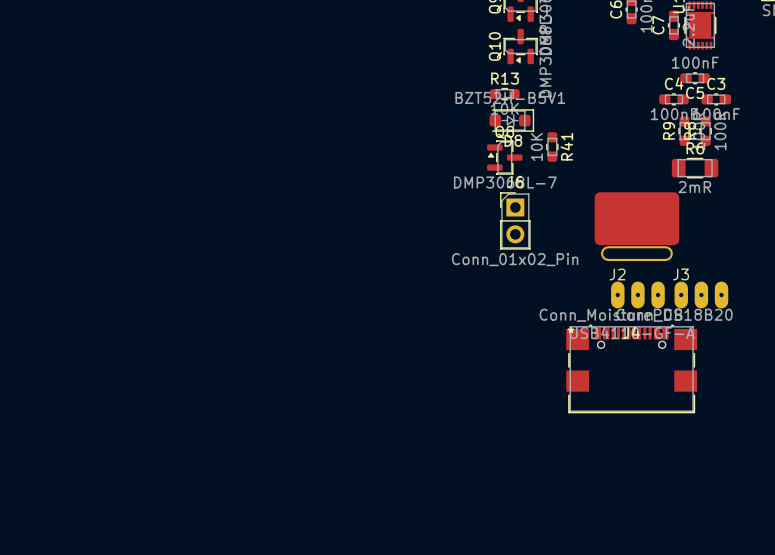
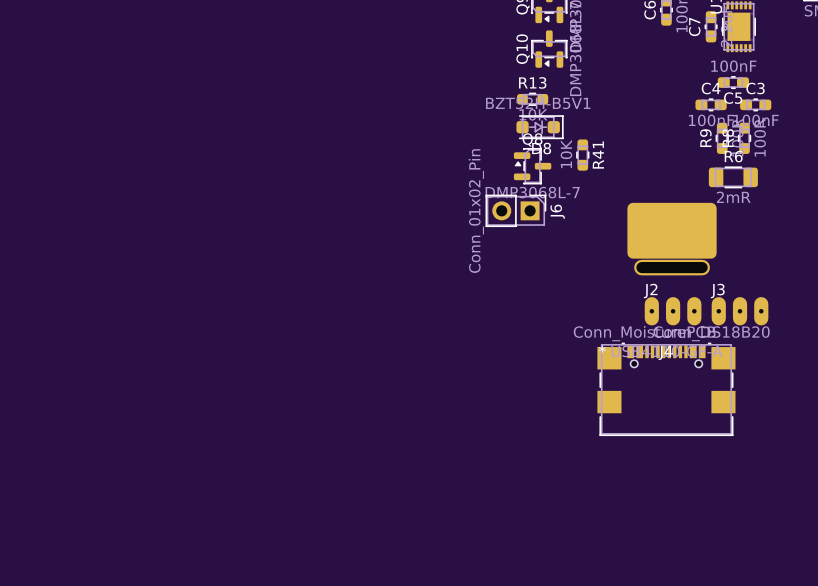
J6 rotation: 0° (515, 220) -> 90° clockwise (515, 210)

